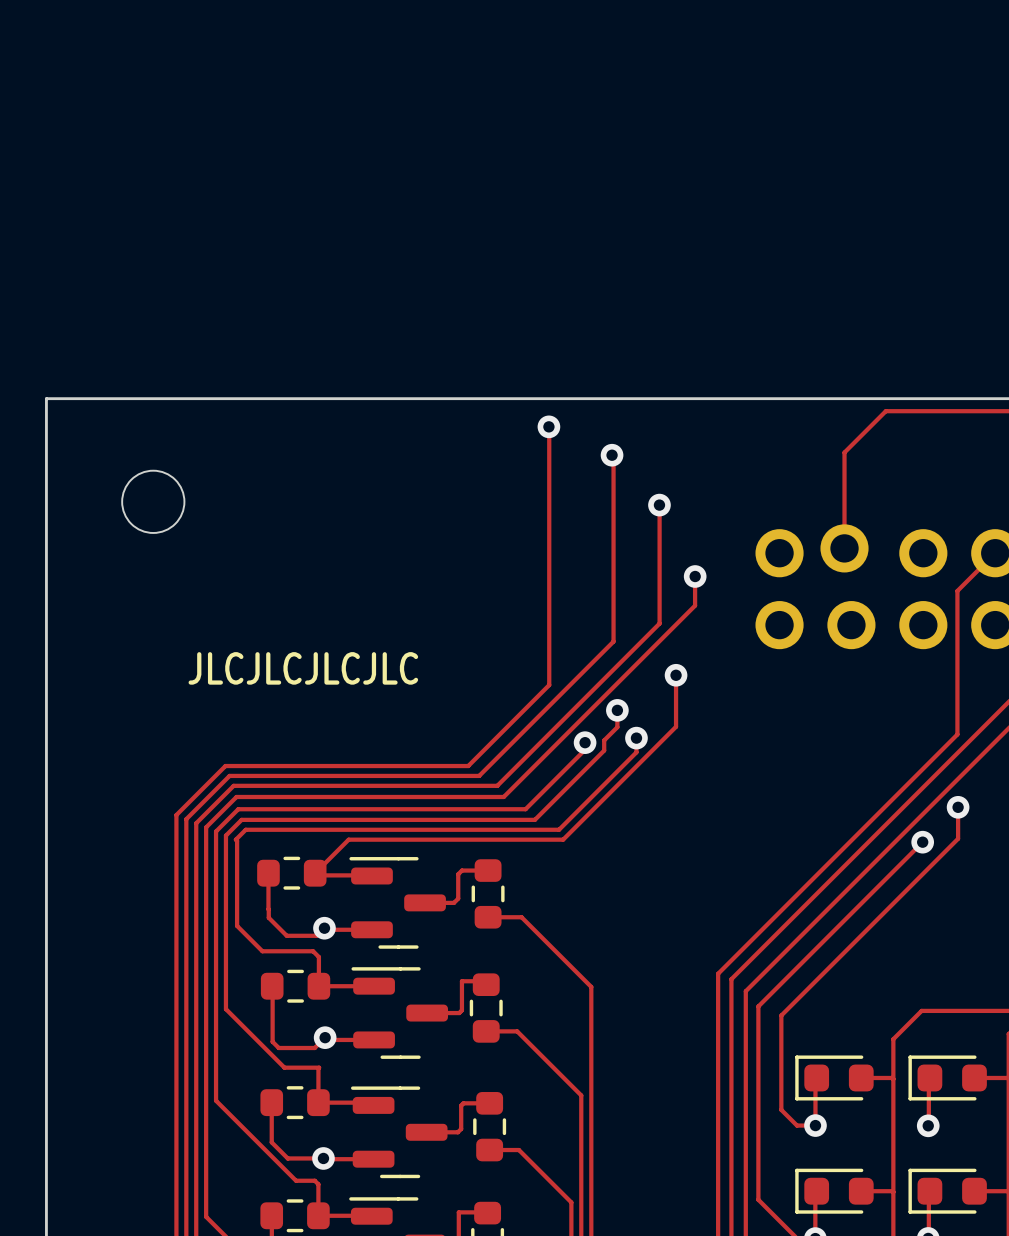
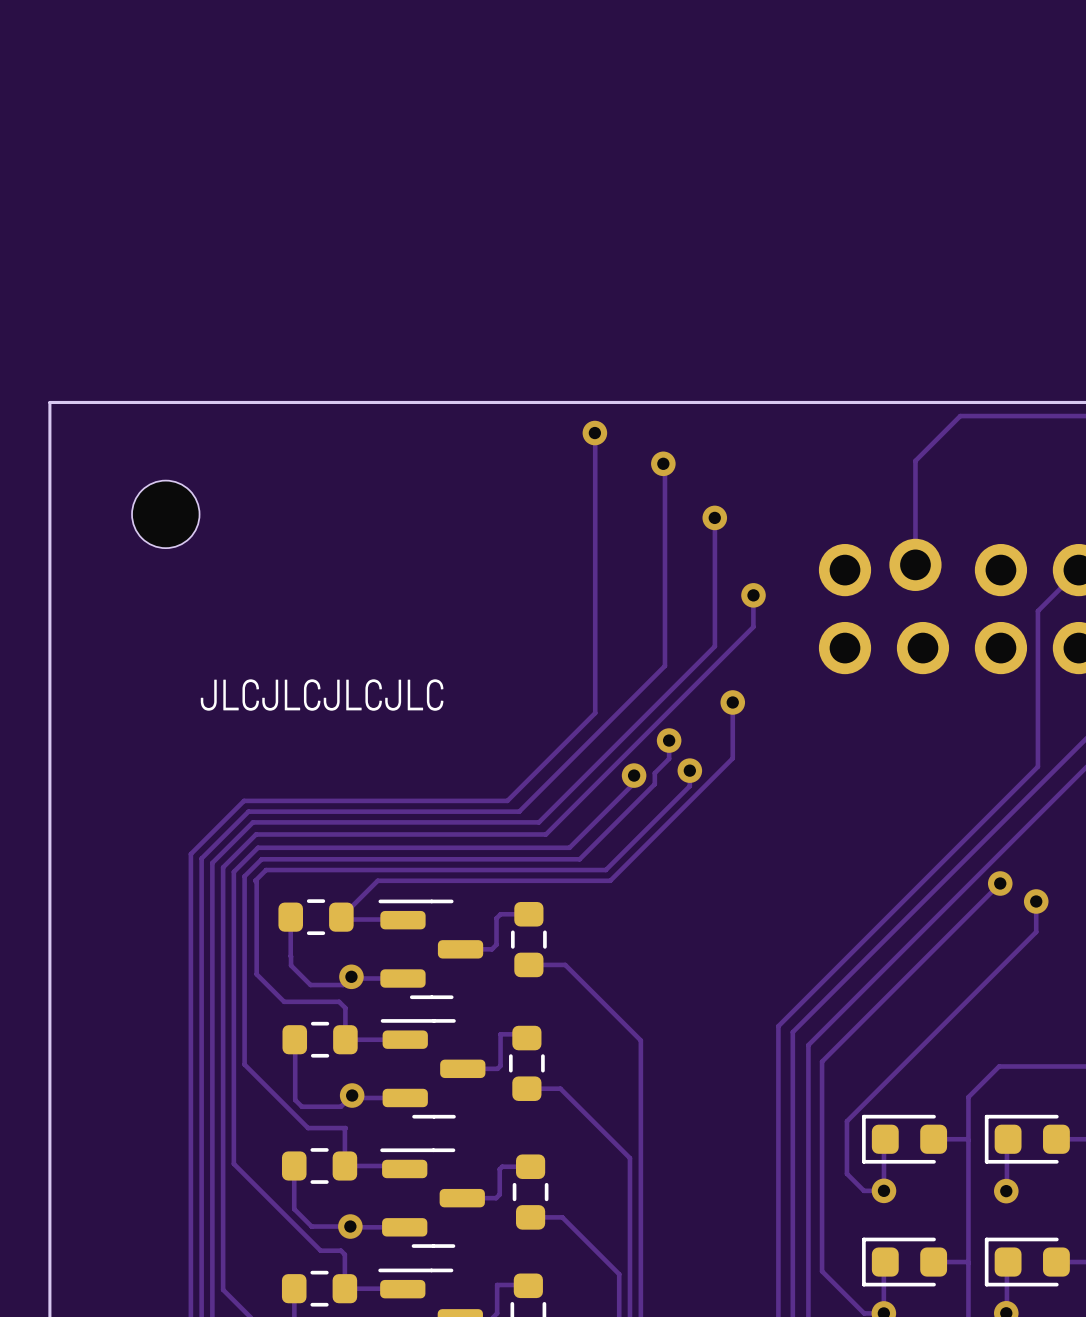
track: (958, 807) (958, 838) (781, 1015) (781, 1061) -> (1036, 901) (1036, 932) (846, 1121)
via position: (958, 807) -> (1036, 901)

